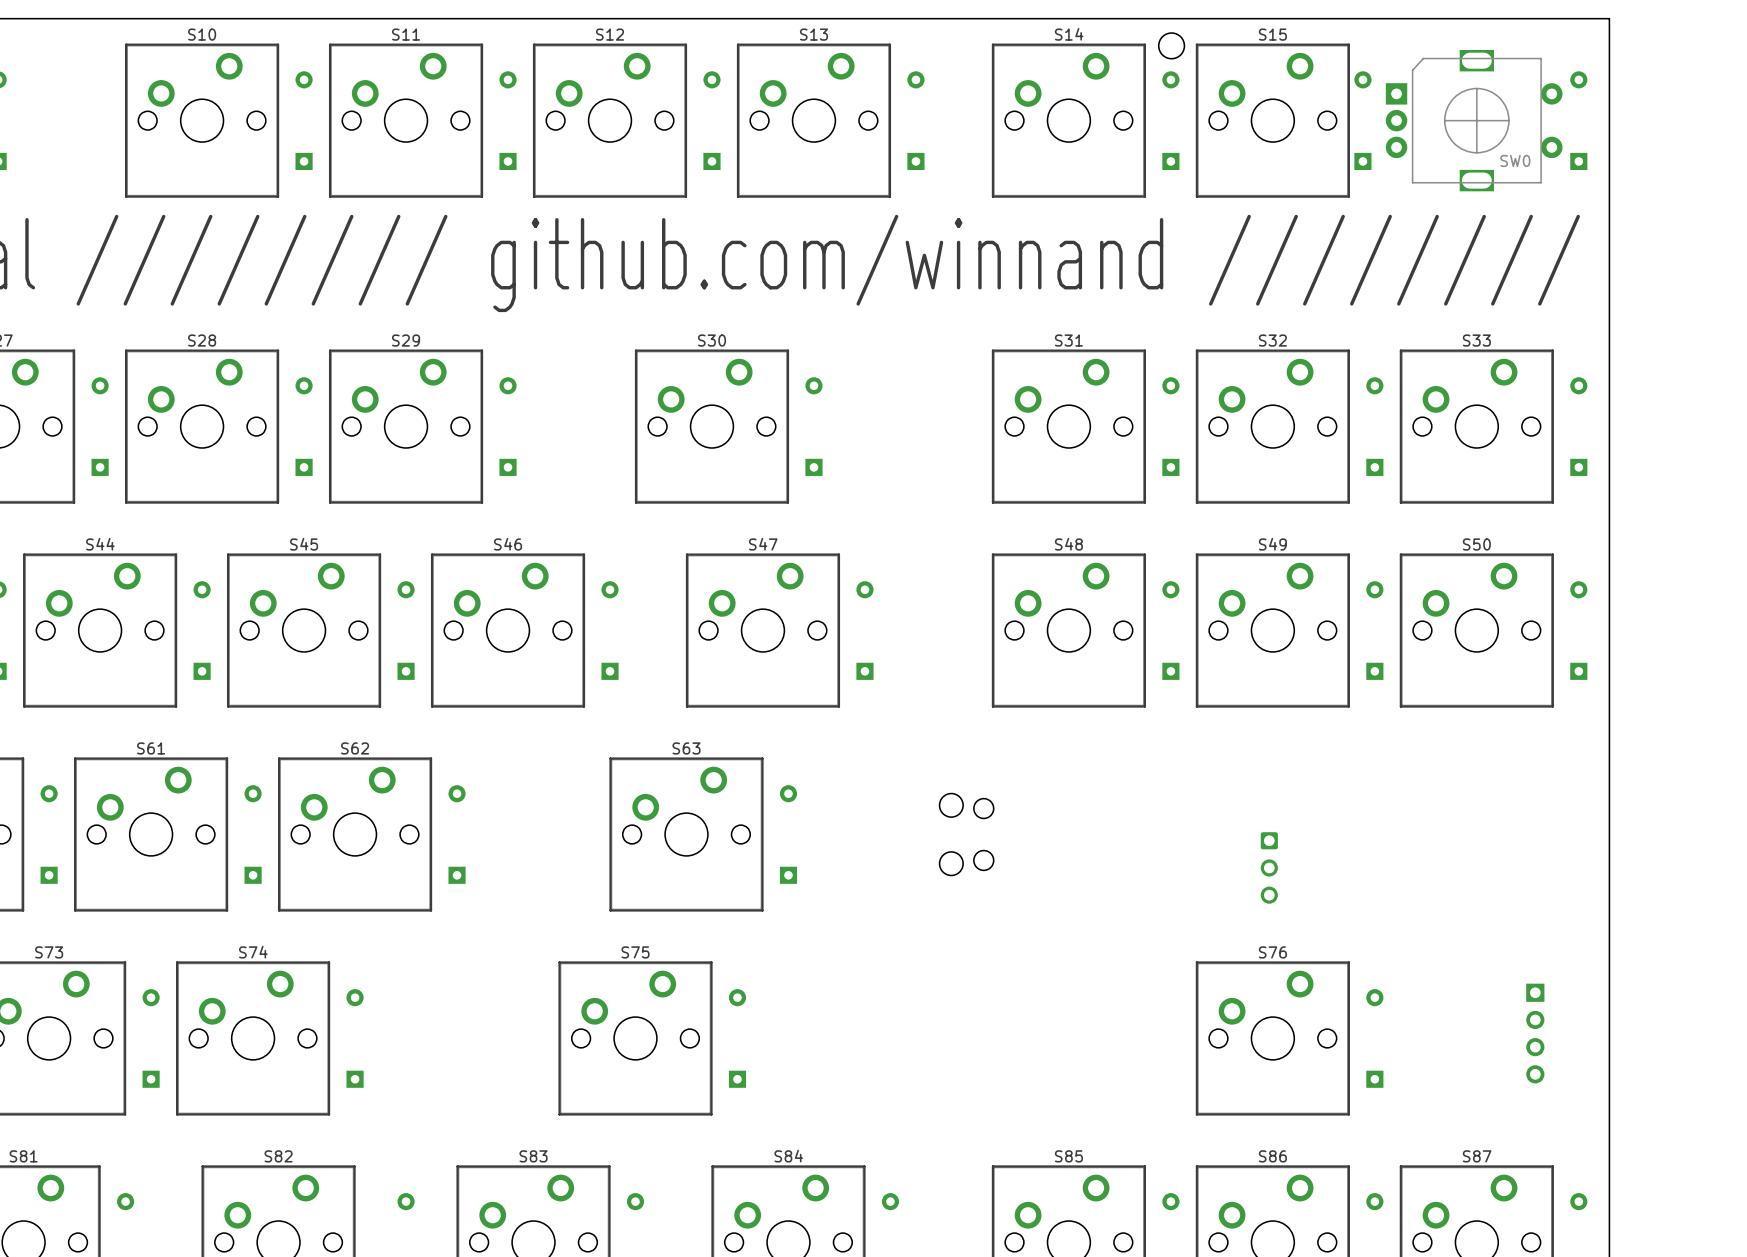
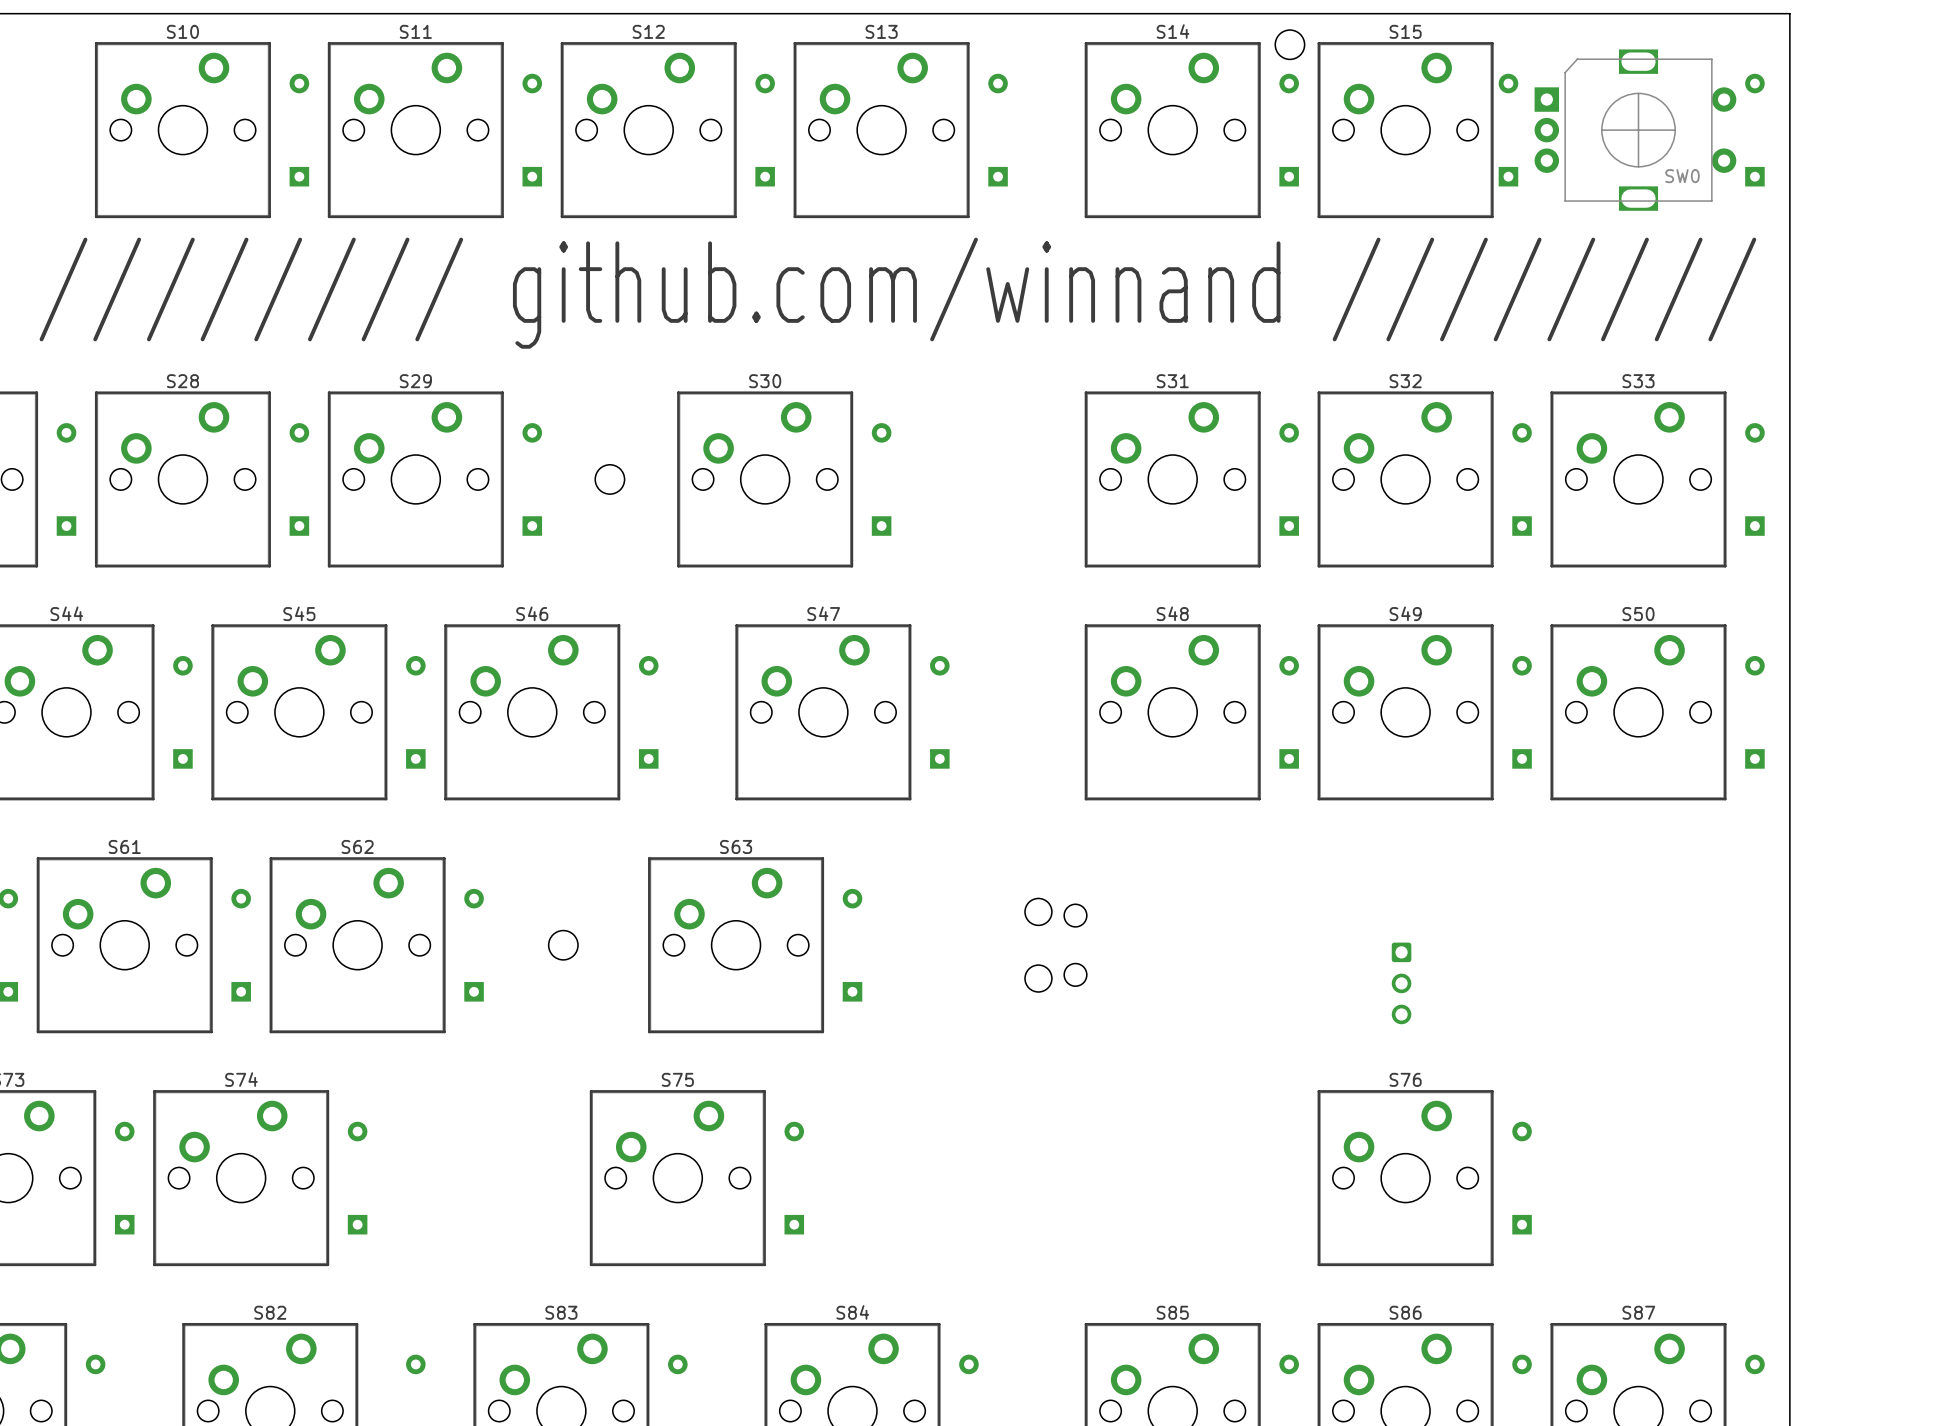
round board edge: none -> [594, 464, 625, 495]
round board edge: none -> [548, 930, 579, 961]
part: (1535, 1033) -> none

